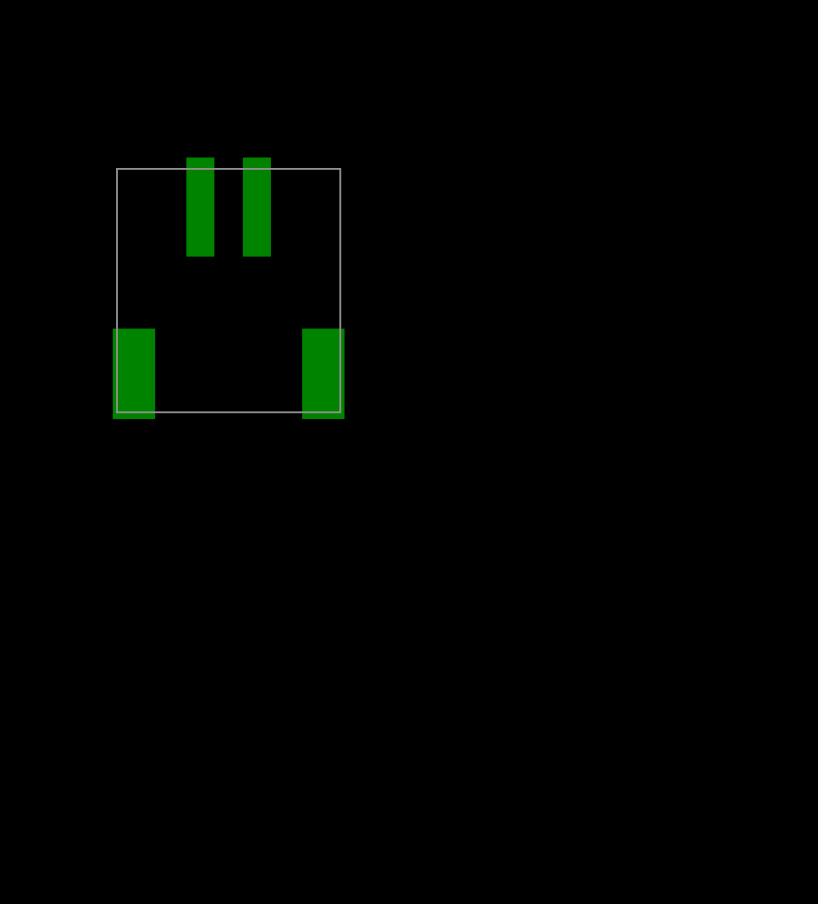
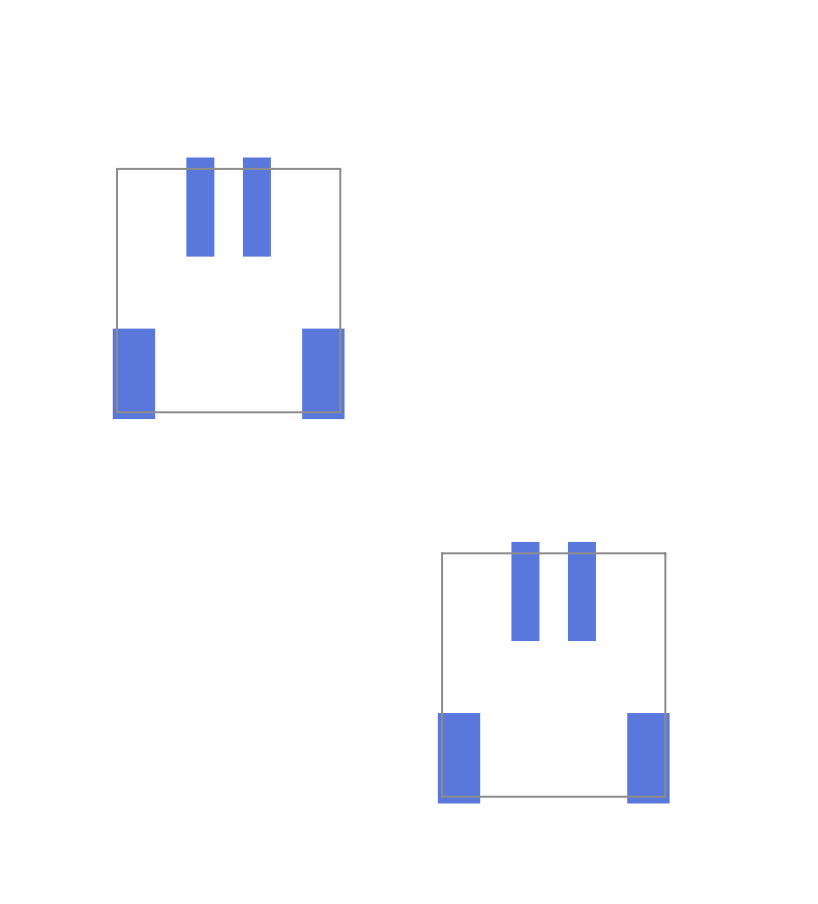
part: none -> (553, 672)

